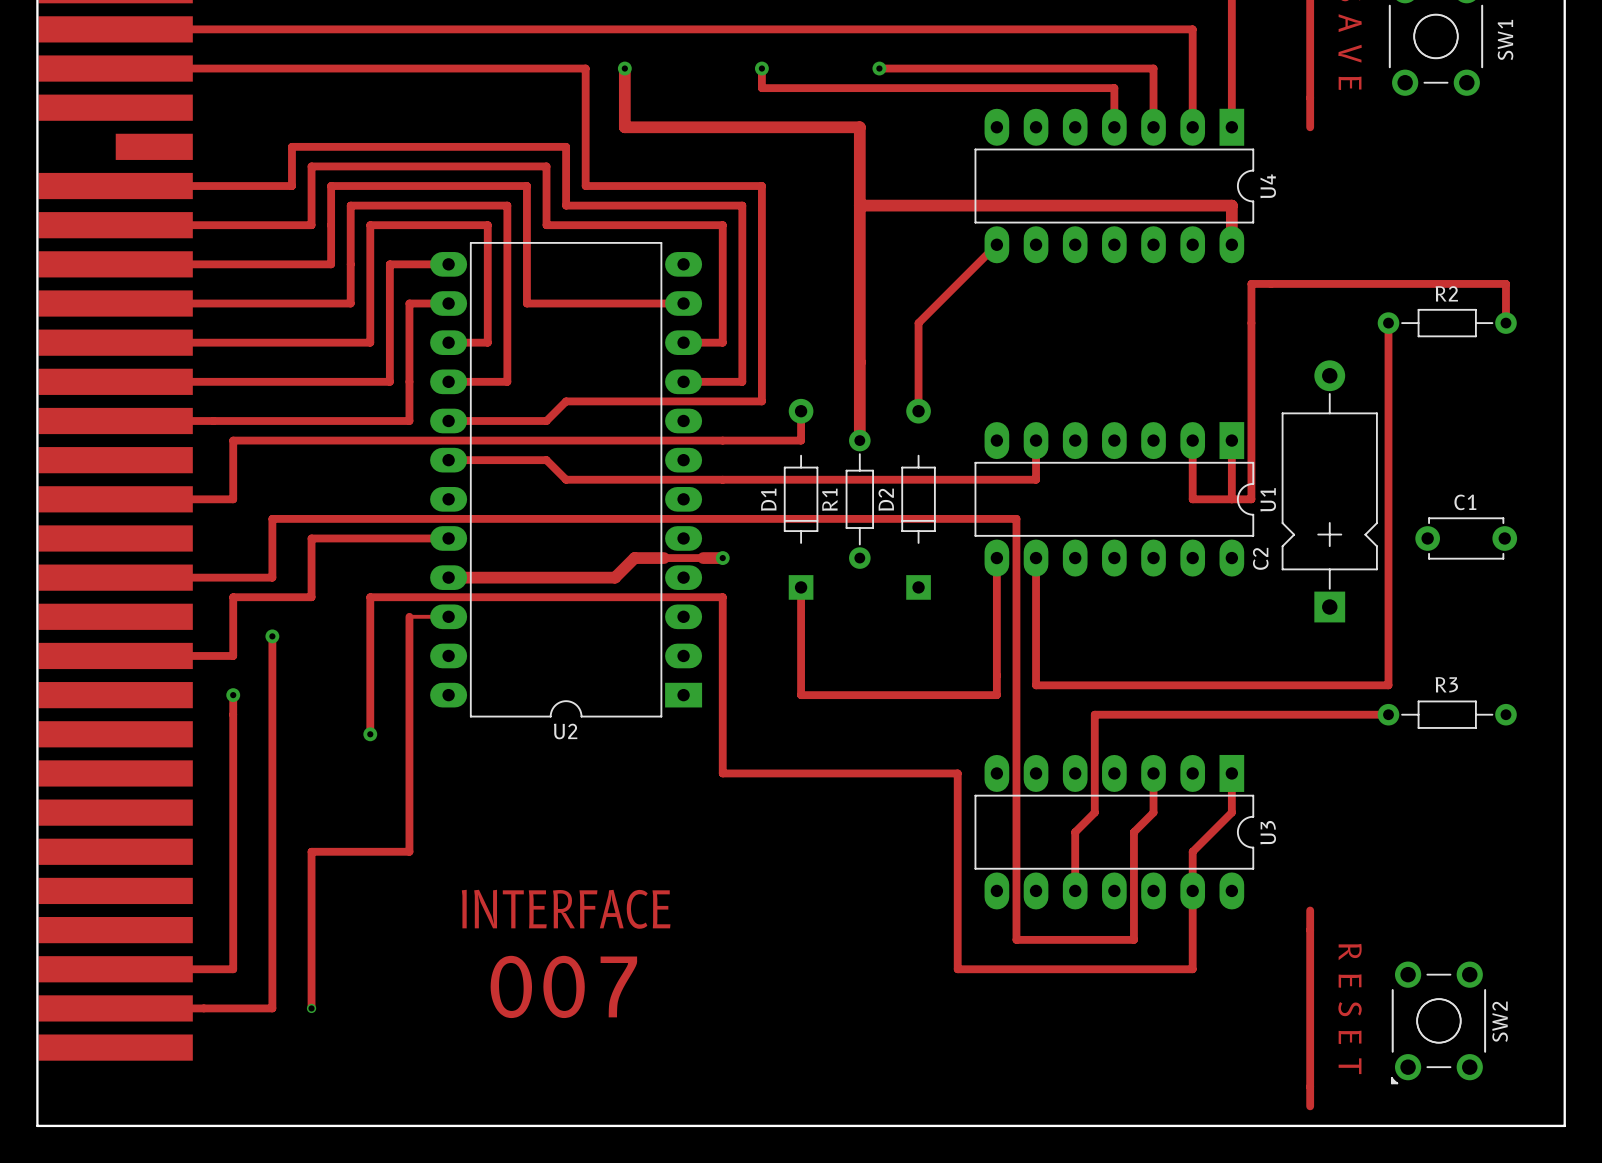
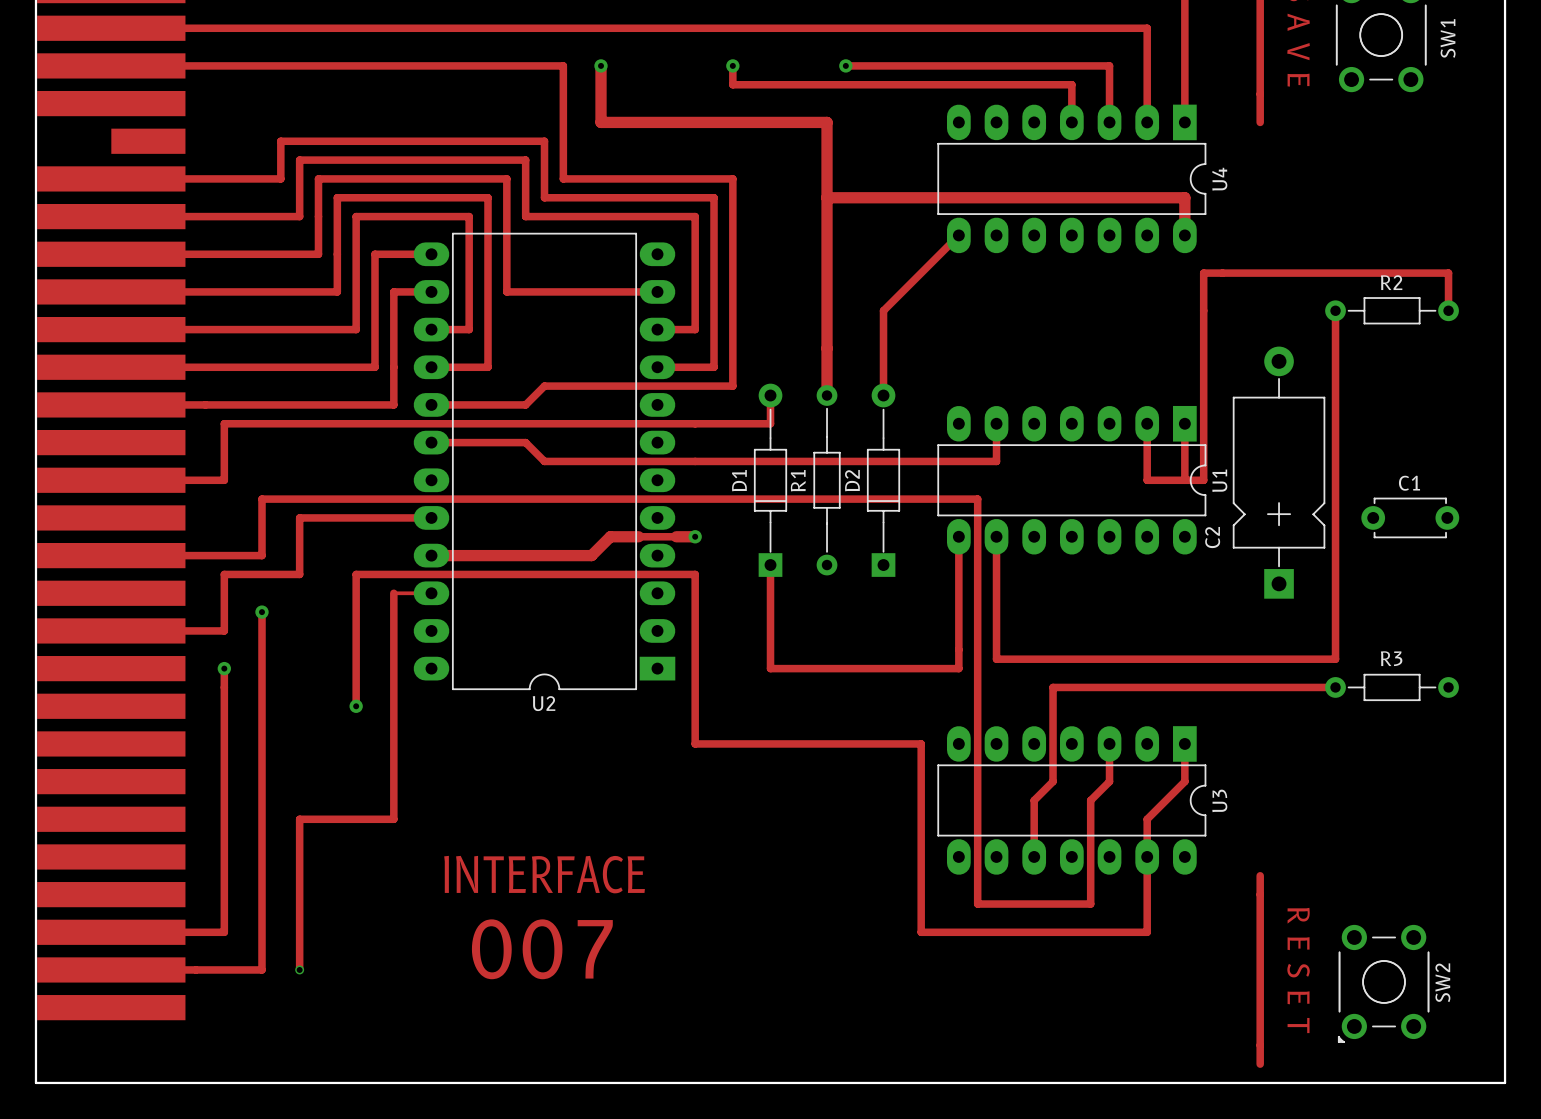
D1 footprint: [783, 398, 819, 600] -> [753, 383, 788, 577]
D2 footprint: [901, 398, 936, 600] -> [866, 383, 901, 577]
track: (859, 411) (859, 440) -> none
R1 footprint: [845, 429, 875, 569] -> [813, 385, 841, 576]

